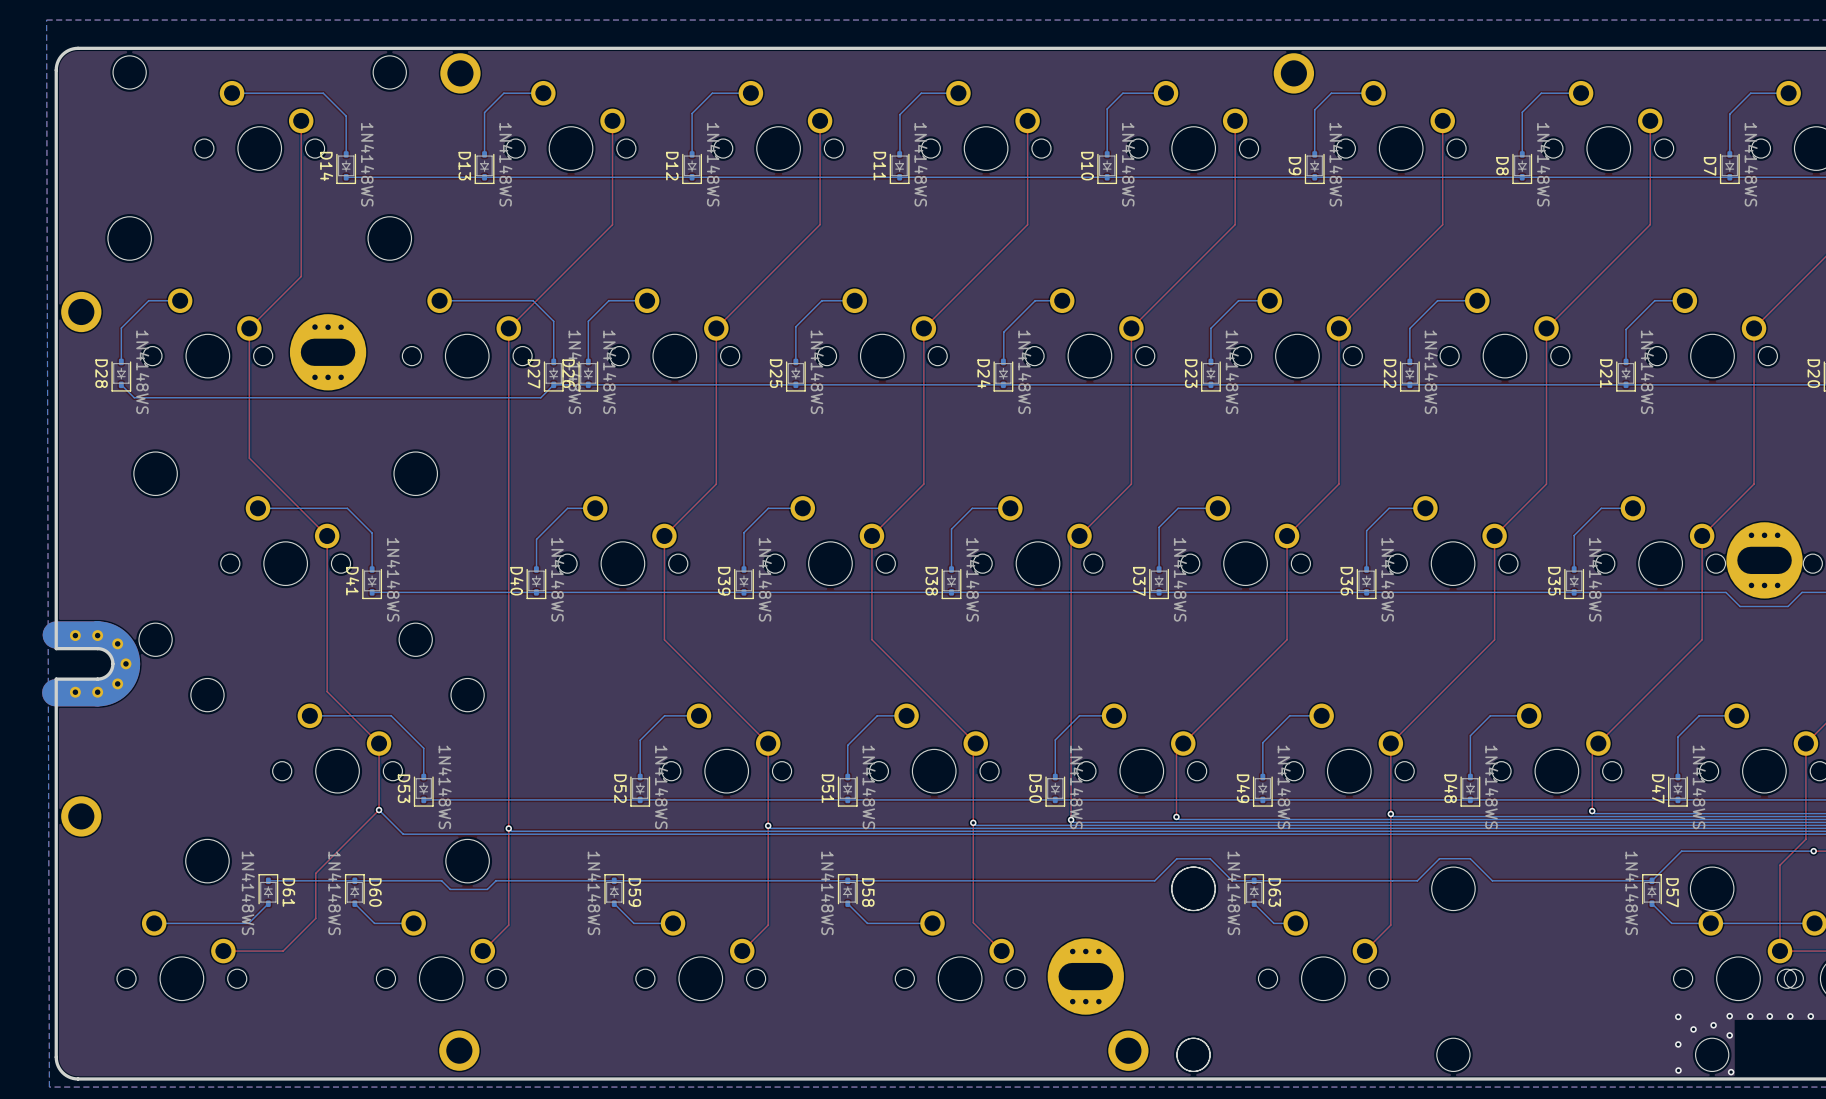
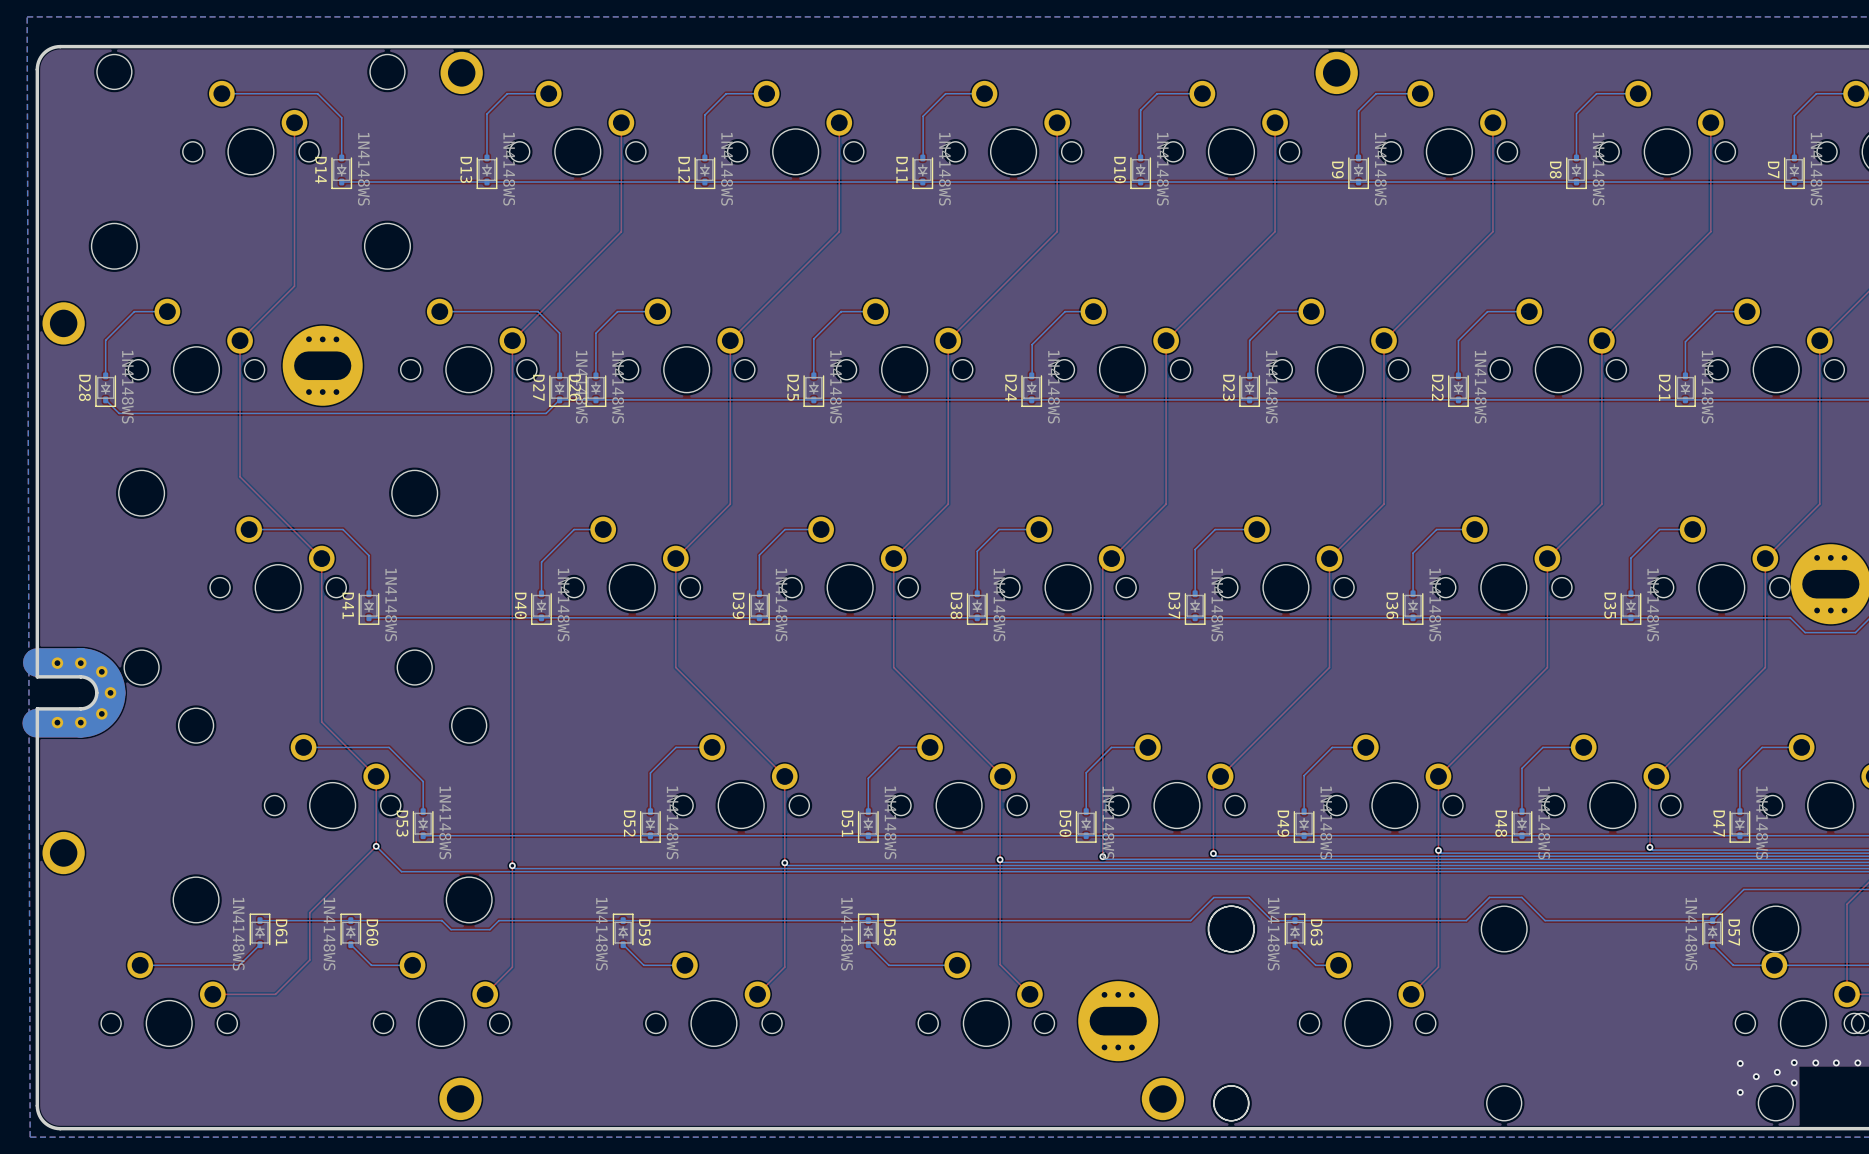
via: (1678, 1070) -> none
via: (1731, 1072) -> none

